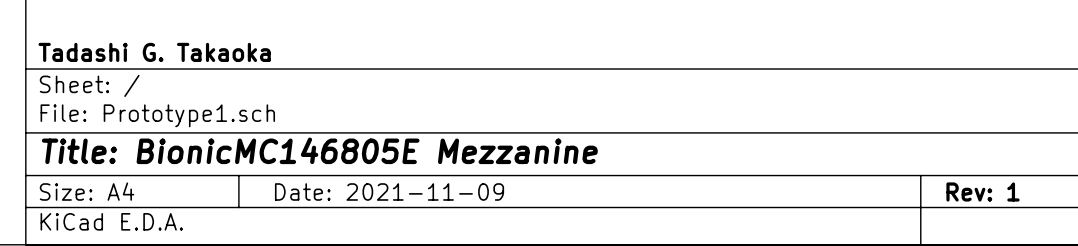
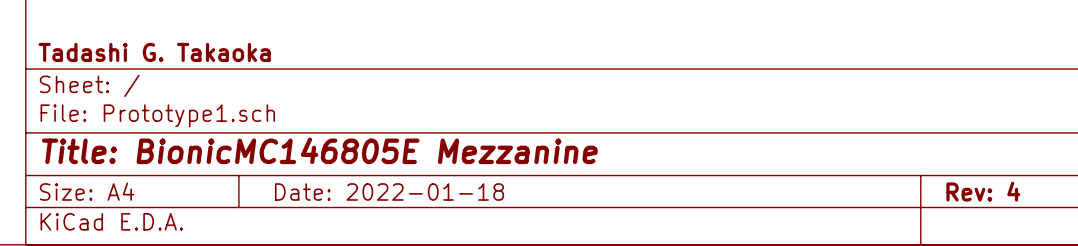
title block: Date: 2021-11-09 (389, 191) -> Date: 2022-01-18 (389, 191)
title block: Rev: 1 (983, 191) -> Rev: 4 (983, 191)

